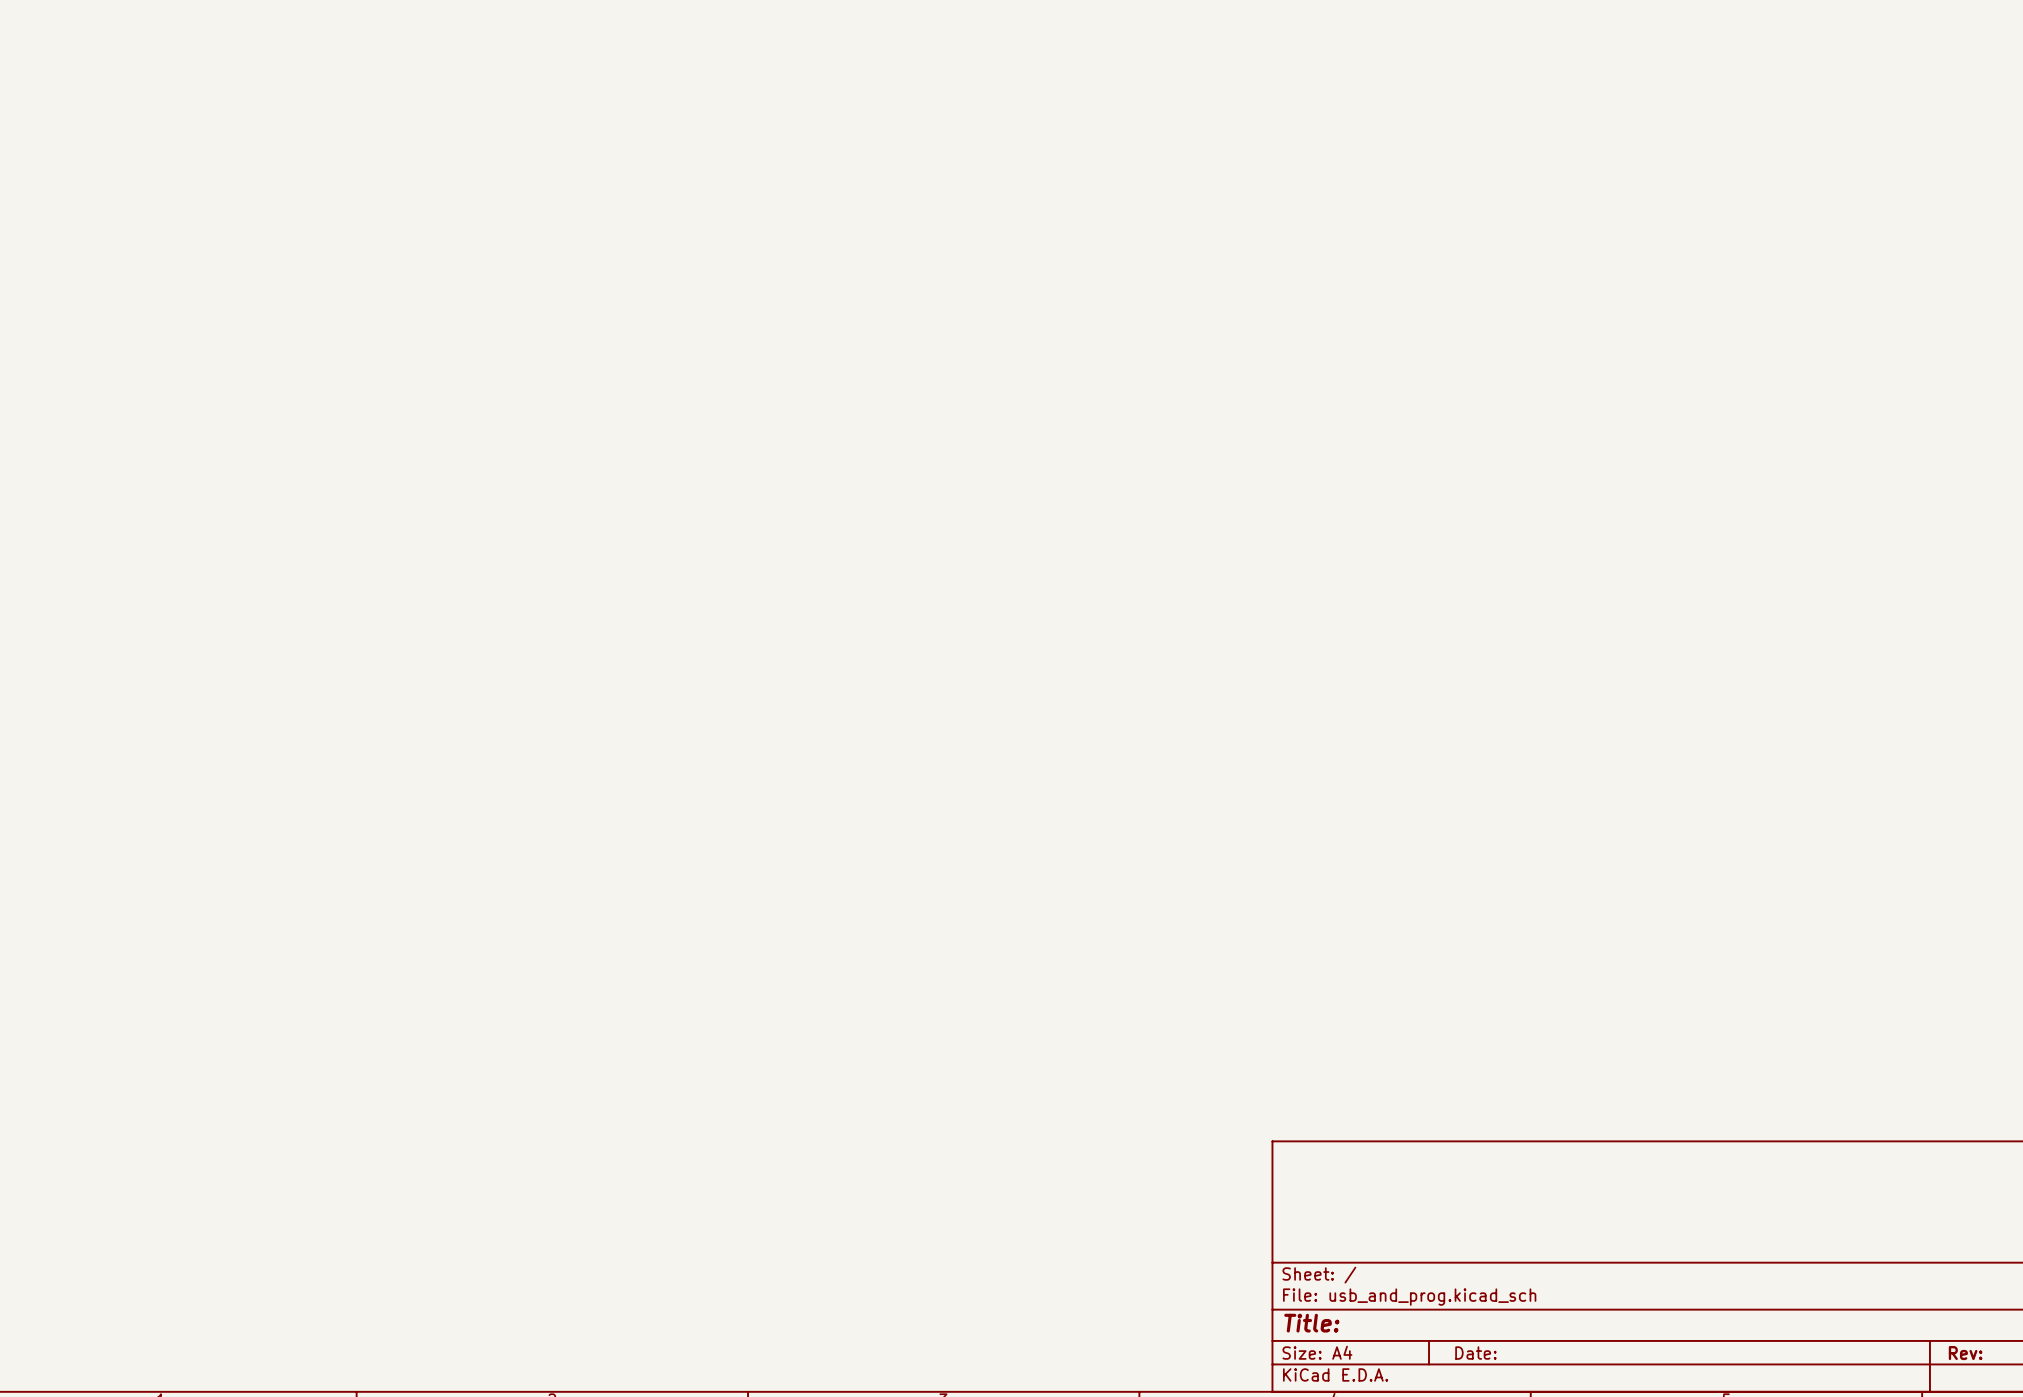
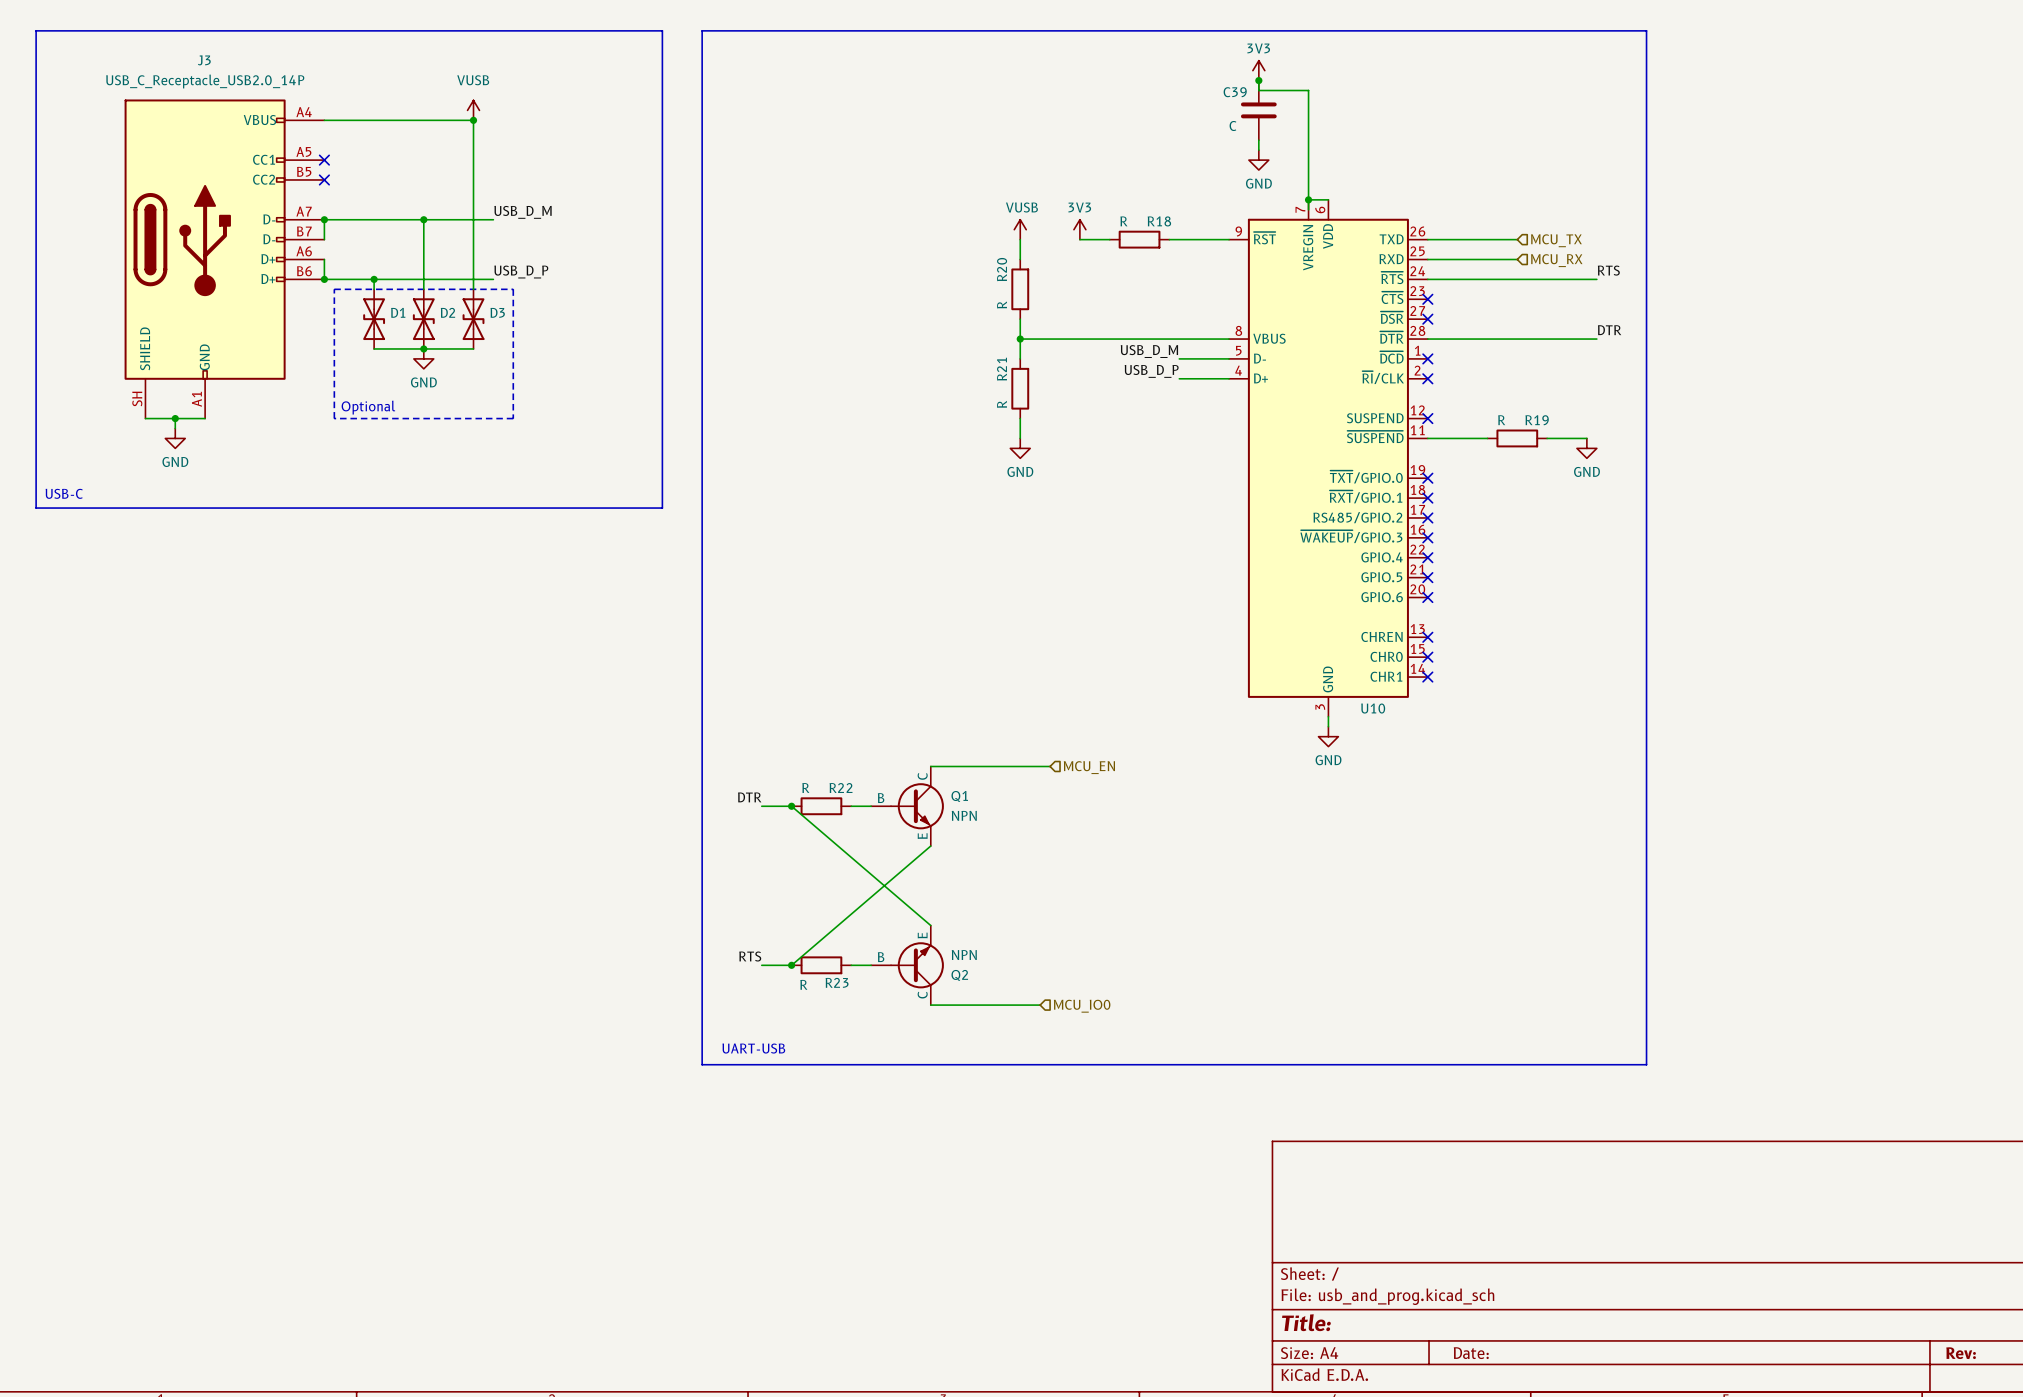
line: none -> (36, 30) (662, 30) (662, 508) (36, 508) (36, 30)
line: none -> (702, 30) (1646, 30) (1646, 1064) (702, 1064) (702, 30)
power symbol: none -> 3V3 (1258, 70)
wire: none -> (1258, 80) (1258, 90) (1308, 90) (1308, 209)
junction: none -> (1258, 80)
power symbol: none -> VUSB (473, 110)
C39: none -> C (1258, 110)
wire: none -> (324, 120) (473, 120) (473, 289)
junction: none -> (473, 120)
wire: none -> (1258, 140) (1258, 150)
no-connect mark: none -> (324, 160)
power symbol: none -> GND (1258, 160)
no-connect mark: none -> (324, 179)
wire: none -> (1308, 199) (1328, 199)
junction: none -> (1308, 199)
label: none -> USB_D_M (523, 212)
junction: none -> (324, 219)
wire: none -> (423, 219) (423, 289)
junction: none -> (423, 219)
wire: none -> (493, 219) (324, 219) (324, 239)
power symbol: none -> VUSB (1020, 229)
power symbol: none -> 3V3 (1079, 229)
wire: none -> (1020, 239) (1020, 259)
wire: none -> (1079, 239) (1109, 239)
R18: none -> R (1139, 239)
wire: none -> (1169, 239) (1229, 239)
wire: none -> (1427, 239) (1517, 239)
hierarchical label: none -> MCU_TX (1556, 240)
J3: none -> USB_C_Receptacle_USB2.0_14P (224, 259)
wire: none -> (324, 259) (324, 279) (493, 279)
wire: none -> (1427, 259) (1517, 259)
hierarchical label: none -> MCU_RX (1556, 260)
label: none -> USB_D_P (521, 272)
label: none -> RTS (1608, 270)
junction: none -> (324, 279)
wire: none -> (374, 279) (374, 289)
junction: none -> (374, 279)
wire: none -> (1427, 279) (1596, 279)
line: none -> (334, 289) (513, 289) (513, 418) (334, 418) (334, 289)
R20: none -> R (1020, 289)
no-connect mark: none -> (1427, 299)
D1: none -> (374, 319)
D2: none -> (423, 319)
D3: none -> (473, 319)
wire: none -> (1020, 319) (1020, 358)
no-connect mark: none -> (1427, 319)
label: none -> DTR (1609, 330)
wire: none -> (1020, 339) (1229, 339)
junction: none -> (1020, 339)
wire: none -> (1427, 339) (1596, 339)
wire: none -> (374, 348) (473, 348)
junction: none -> (423, 348)
label: none -> USB_D_M (1149, 351)
power symbol: none -> GND (423, 358)
wire: none -> (1179, 358) (1229, 358)
no-connect mark: none -> (1427, 358)
label: none -> USB_D_P (1151, 371)
wire: none -> (1179, 378) (1229, 378)
no-connect mark: none -> (1427, 378)
R21: none -> R (1020, 388)
text: none -> Optional (368, 407)
wire: none -> (145, 418) (205, 418)
wire: none -> (175, 418) (175, 428)
junction: none -> (175, 418)
wire: none -> (1020, 418) (1020, 438)
no-connect mark: none -> (1427, 418)
power symbol: none -> GND (175, 438)
wire: none -> (1427, 438) (1487, 438)
R19: none -> R (1517, 438)
wire: none -> (1547, 438) (1586, 438)
power symbol: none -> GND (1020, 448)
power symbol: none -> GND (1586, 448)
U10: none -> (1328, 458)
no-connect mark: none -> (1427, 478)
text: none -> USB-C (64, 493)
no-connect mark: none -> (1427, 498)
no-connect mark: none -> (1427, 517)
no-connect mark: none -> (1427, 537)
no-connect mark: none -> (1427, 557)
no-connect mark: none -> (1427, 577)
no-connect mark: none -> (1427, 597)
no-connect mark: none -> (1427, 637)
no-connect mark: none -> (1427, 657)
no-connect mark: none -> (1427, 677)
wire: none -> (1328, 716) (1328, 726)
power symbol: none -> GND (1328, 736)
wire: none -> (930, 766) (1050, 766)
hierarchical label: none -> MCU_EN (1089, 767)
label: none -> DTR (749, 797)
wire: none -> (761, 806) (791, 806) (930, 925)
junction: none -> (791, 806)
R22: none -> R (821, 806)
wire: none -> (851, 806) (871, 806)
Q1: none -> NPN (907, 806)
wire: none -> (930, 846) (791, 965) (761, 965)
label: none -> RTS (750, 956)
junction: none -> (791, 965)
R23: none -> R (821, 965)
wire: none -> (851, 965) (871, 965)
Q2: none -> NPN (907, 965)
wire: none -> (930, 1005) (1040, 1005)
hierarchical label: none -> MCU_IO0 (1082, 1006)
text: none -> UART-USB (753, 1048)

